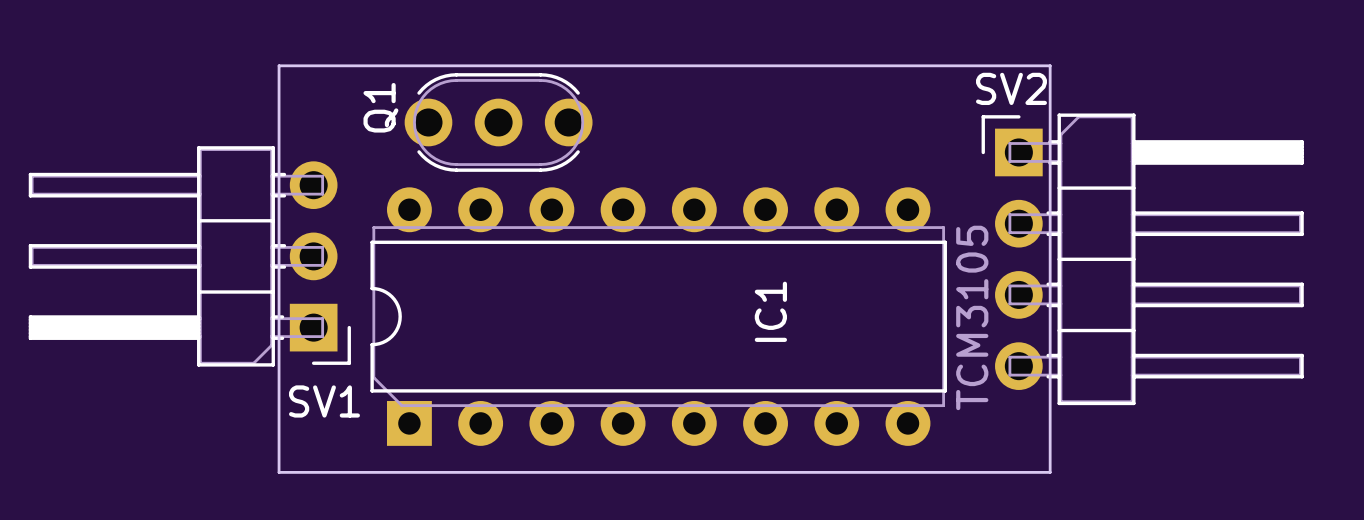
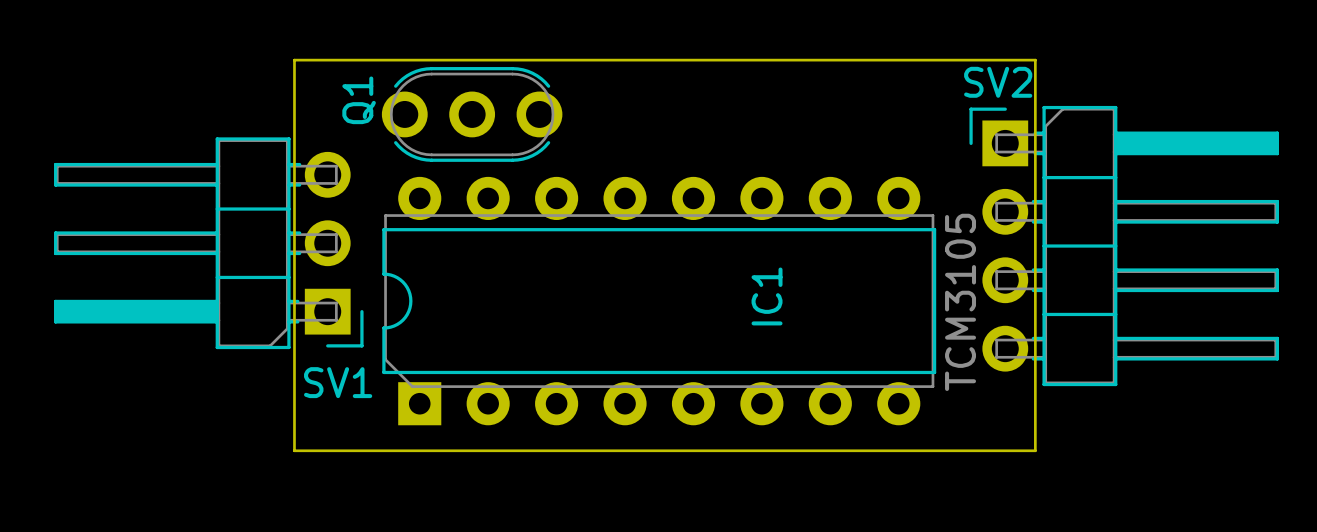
Q1 position: (498, 122) -> (472, 114)

